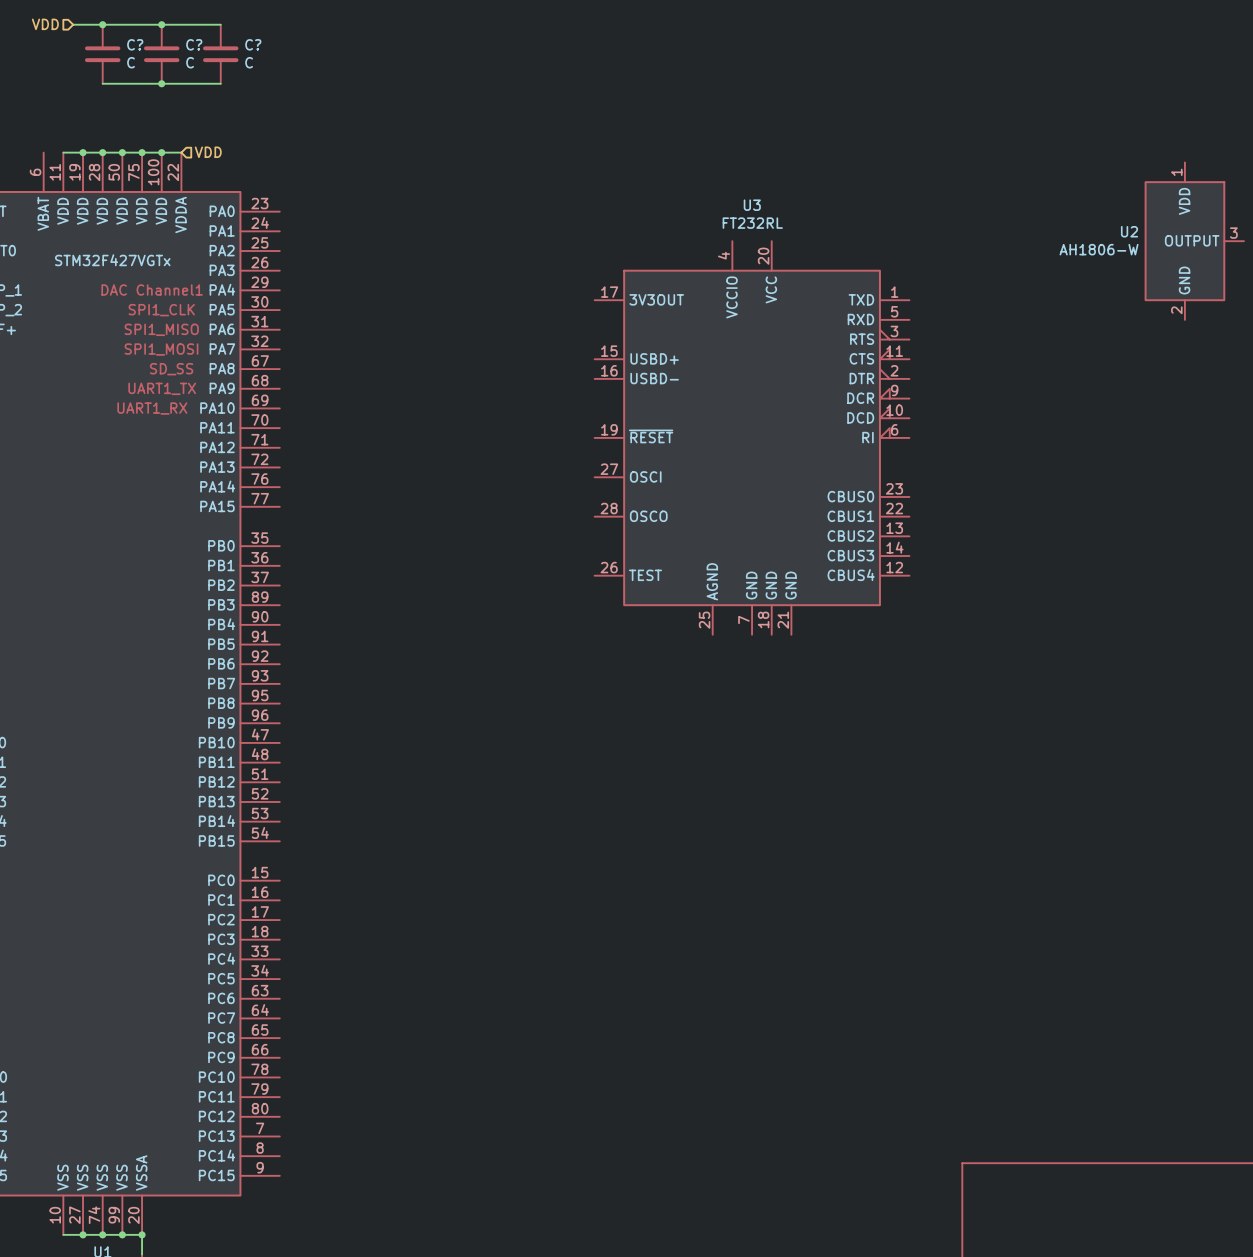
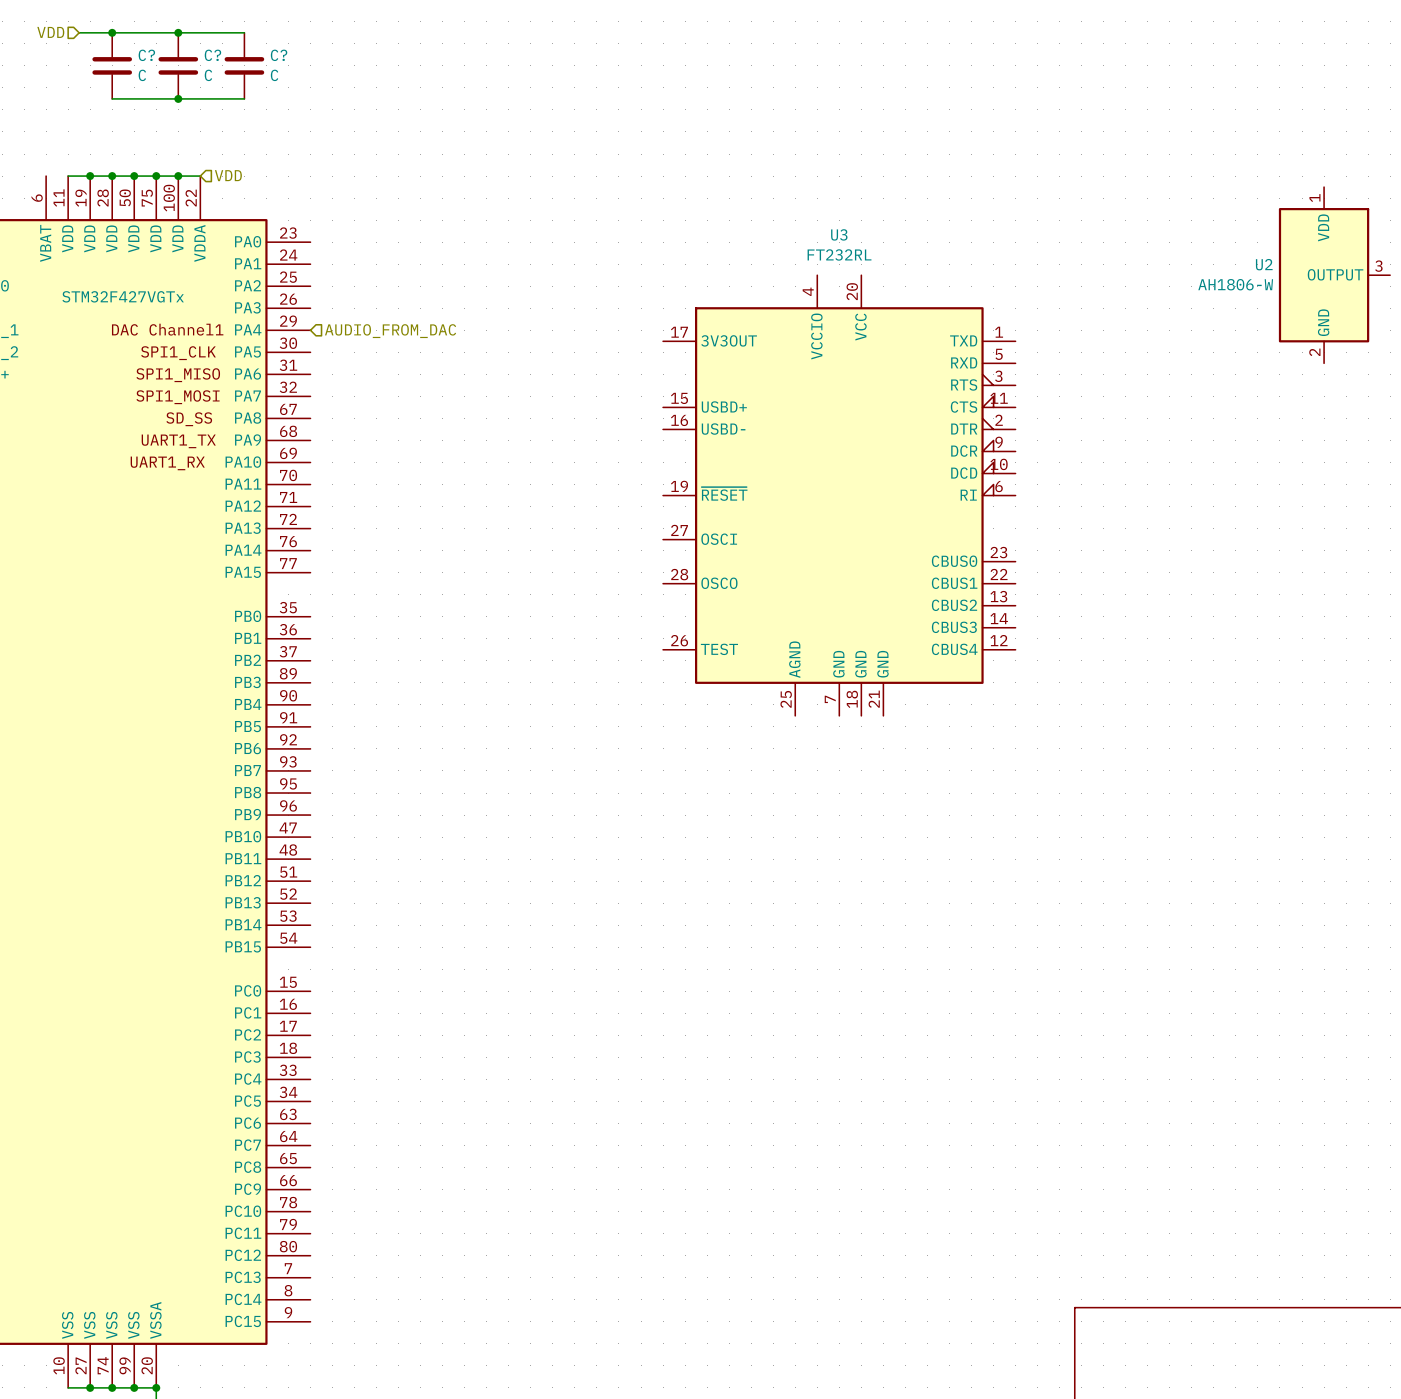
hierarchical label: none -> AUDIO_FROM_DAC (390, 331)

